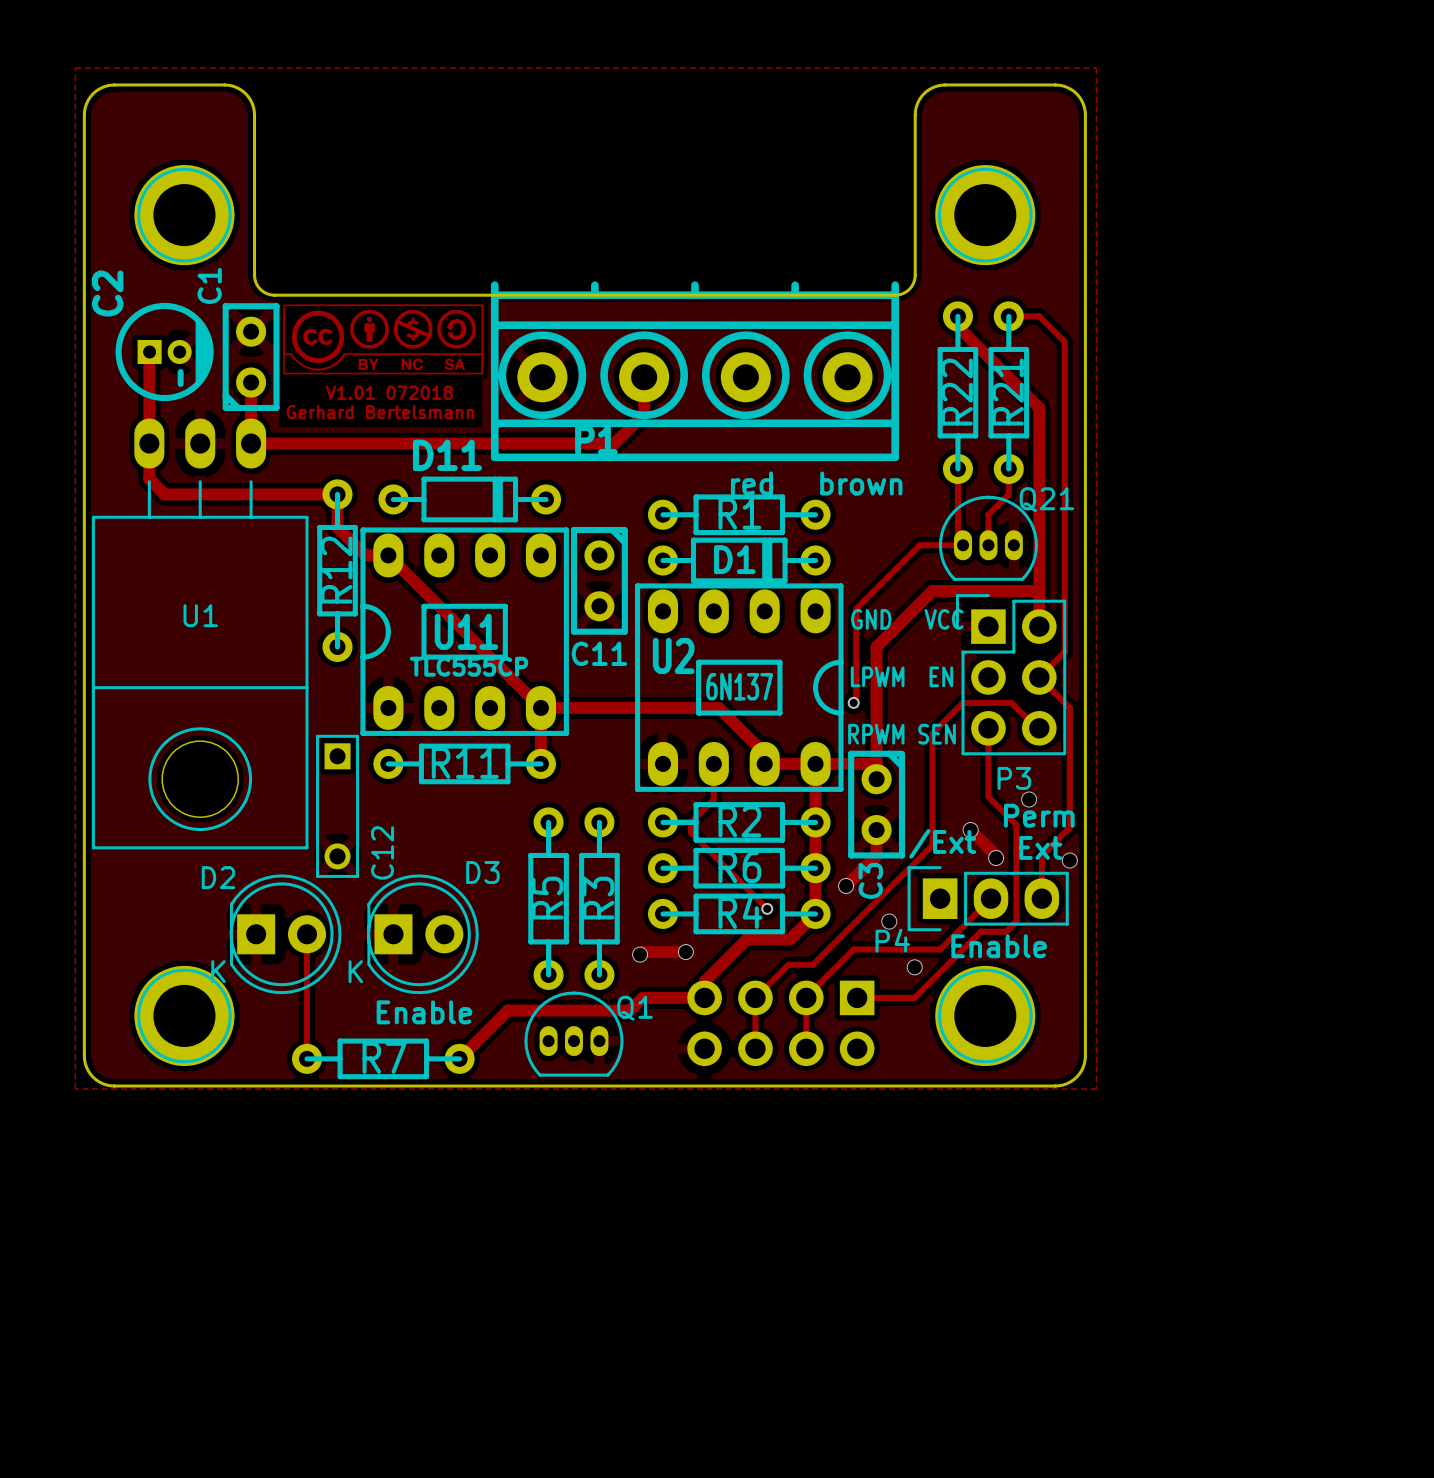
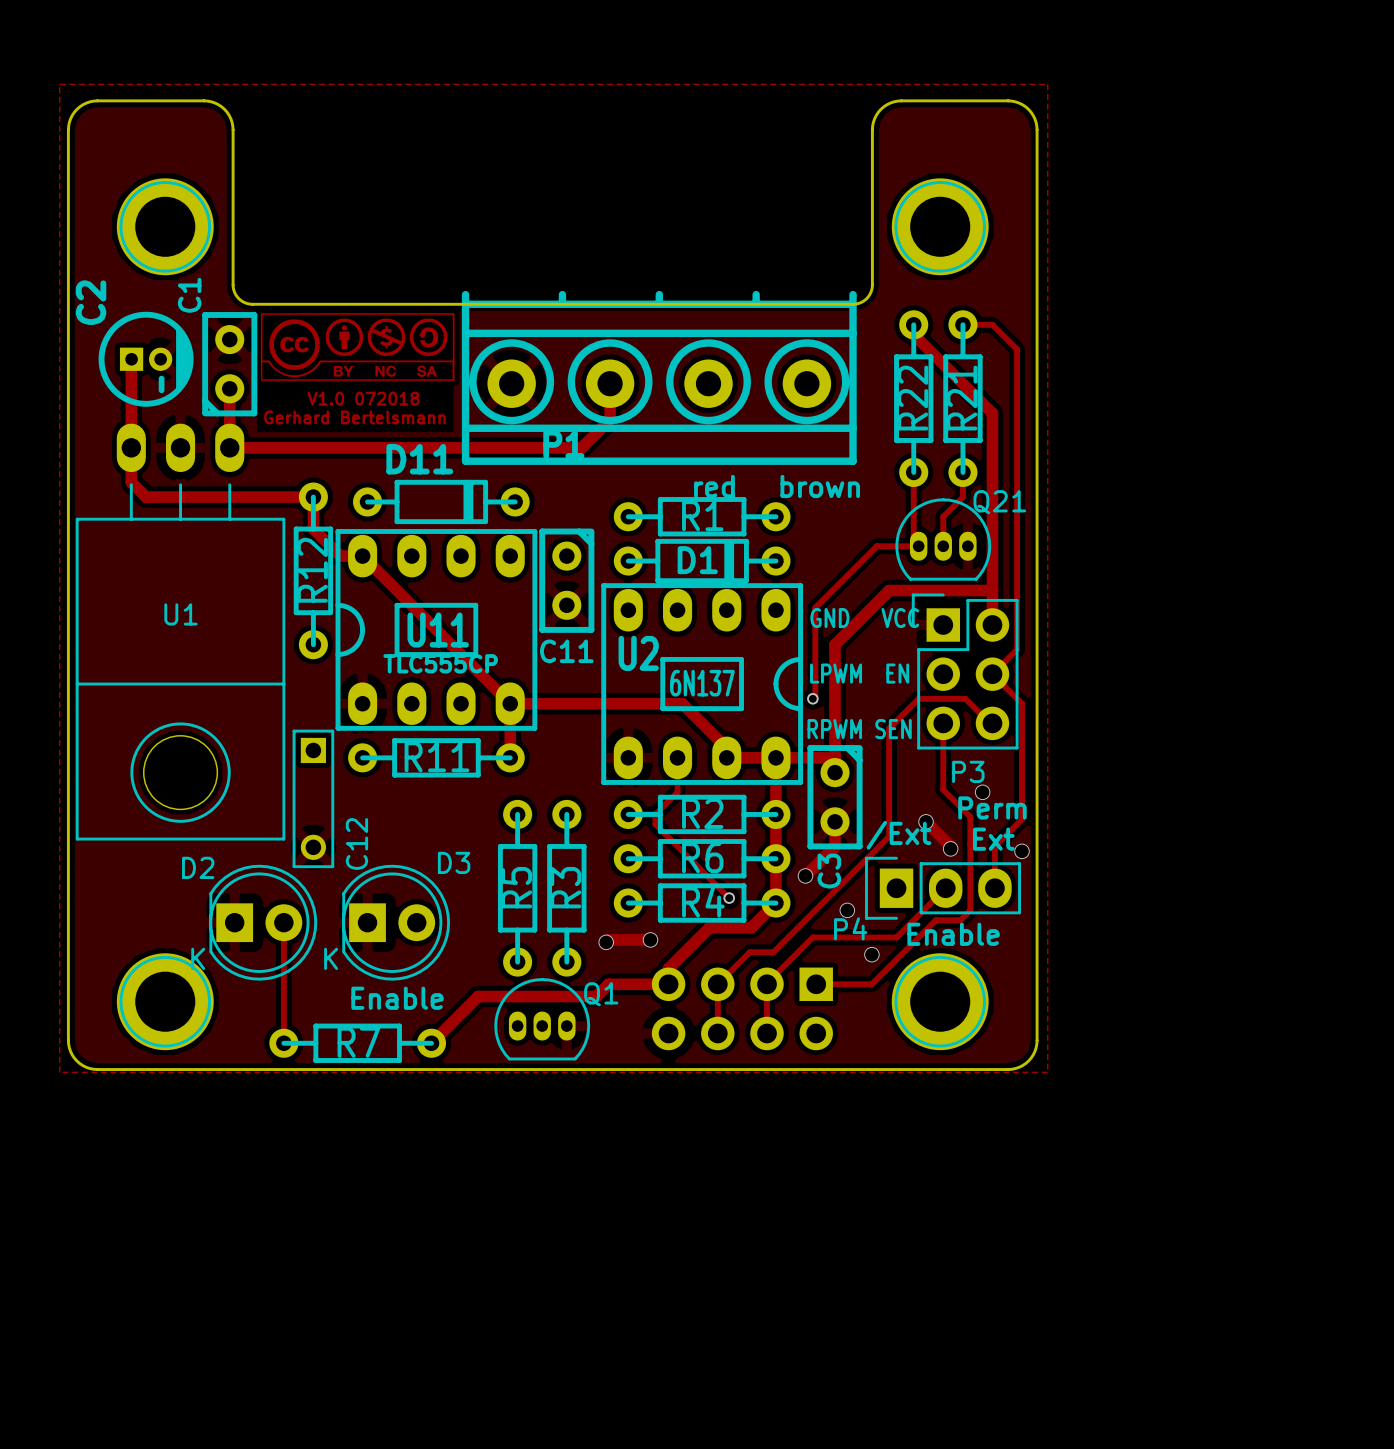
text: V1.01 072018 (389, 392) -> V1.0 072018 (363, 398)

